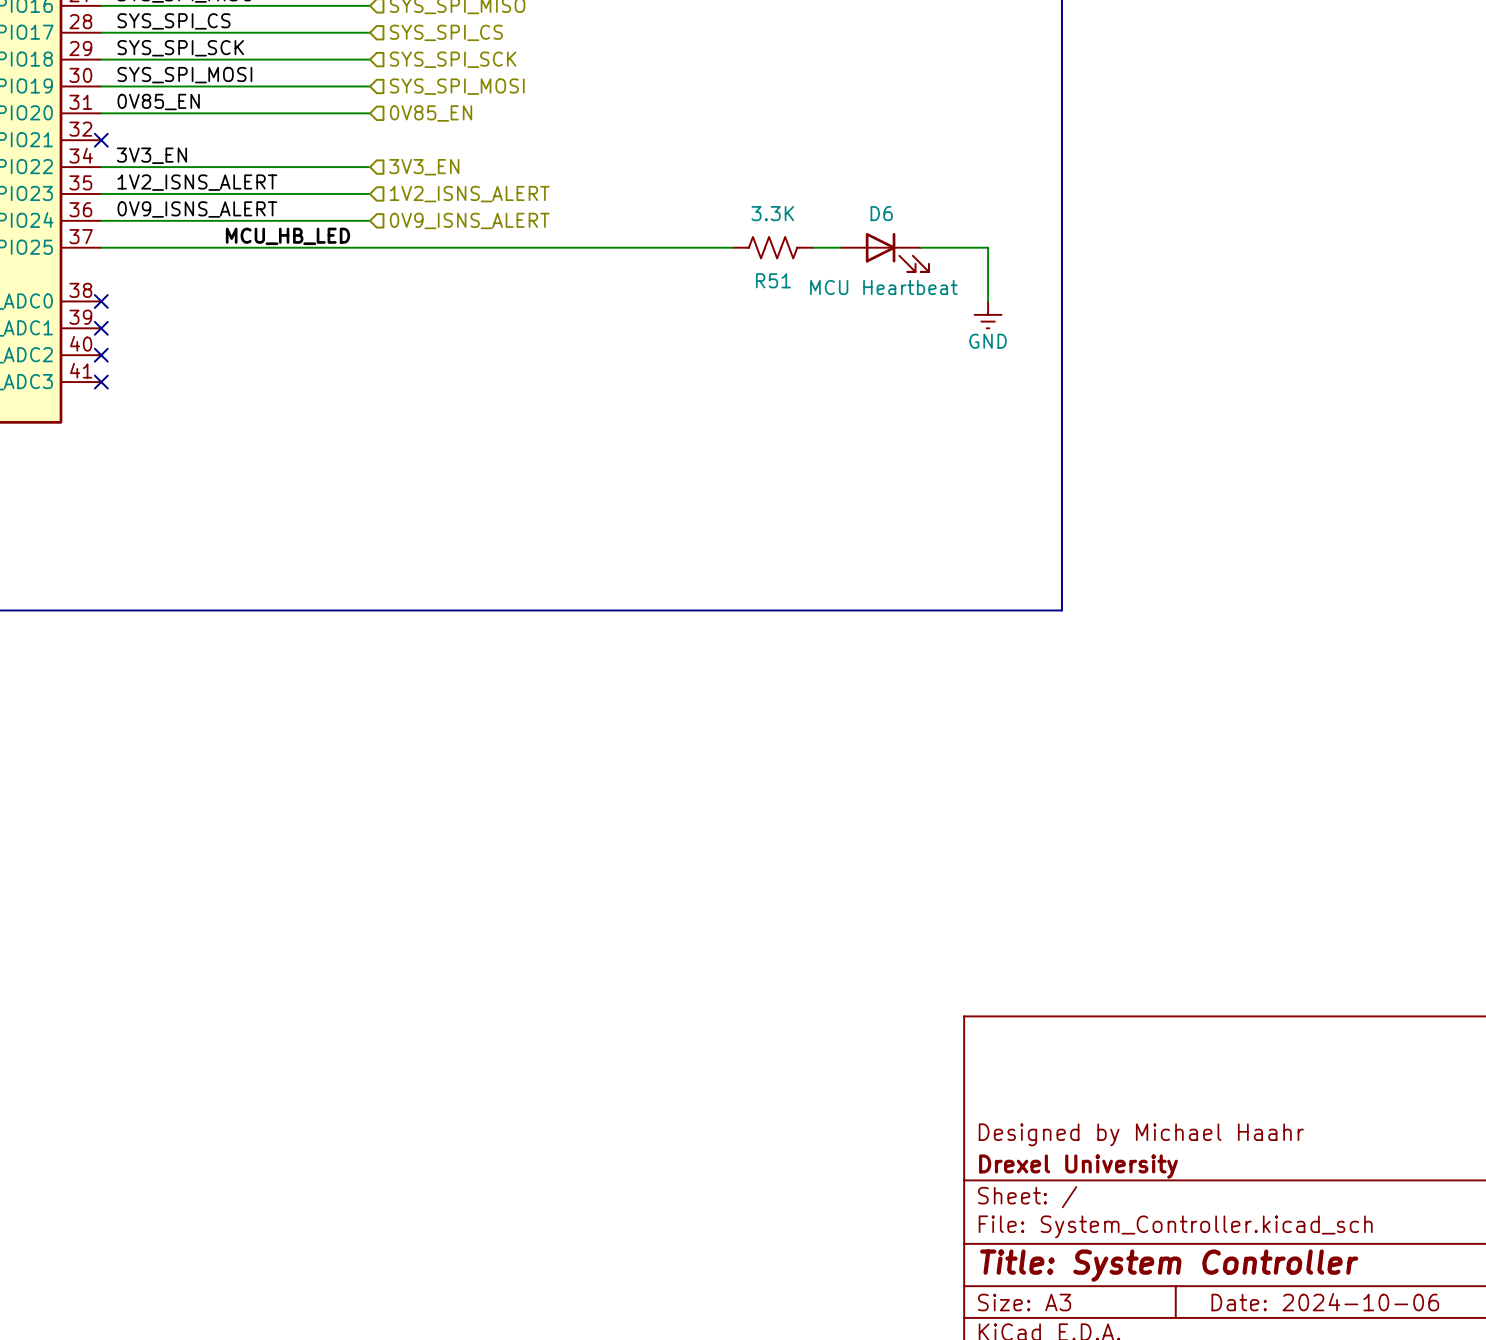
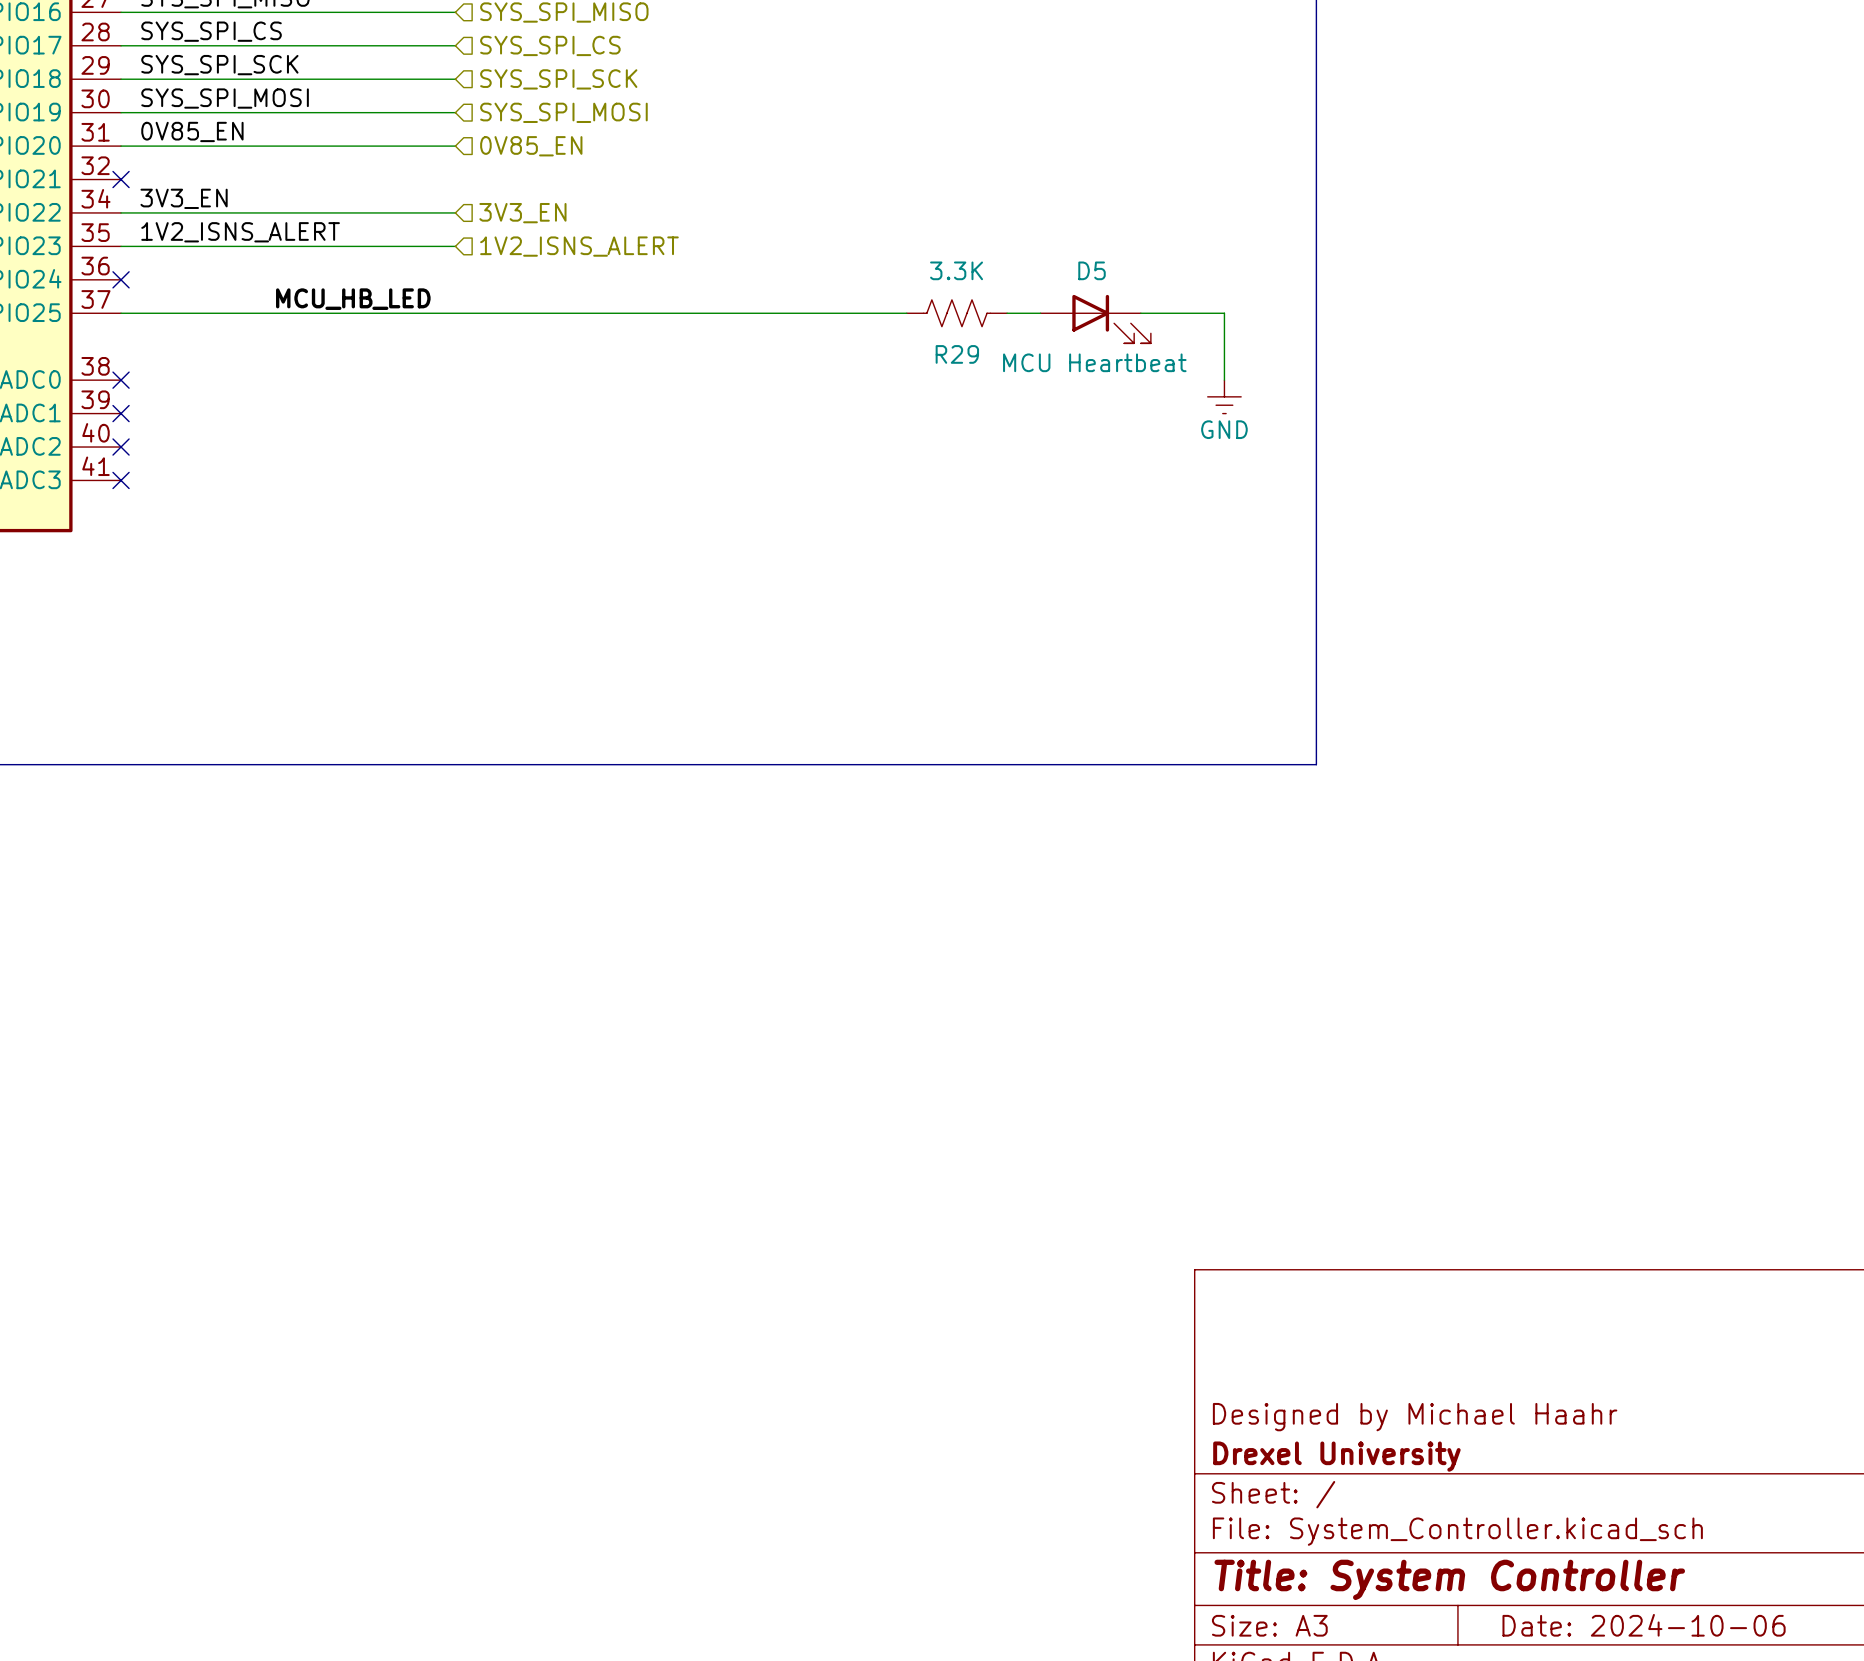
label: 0V9_ISNS_ALERT (197, 209) -> none
D6 name: D6 (881, 213) -> D5 (1092, 270)
wire: (101, 220) (370, 220) -> none
no-connect mark: none -> (121, 279)
hierarchical label: 0V9_ISNS_ALERT (469, 220) -> none
R51 name: R51 (773, 280) -> R29 (957, 354)

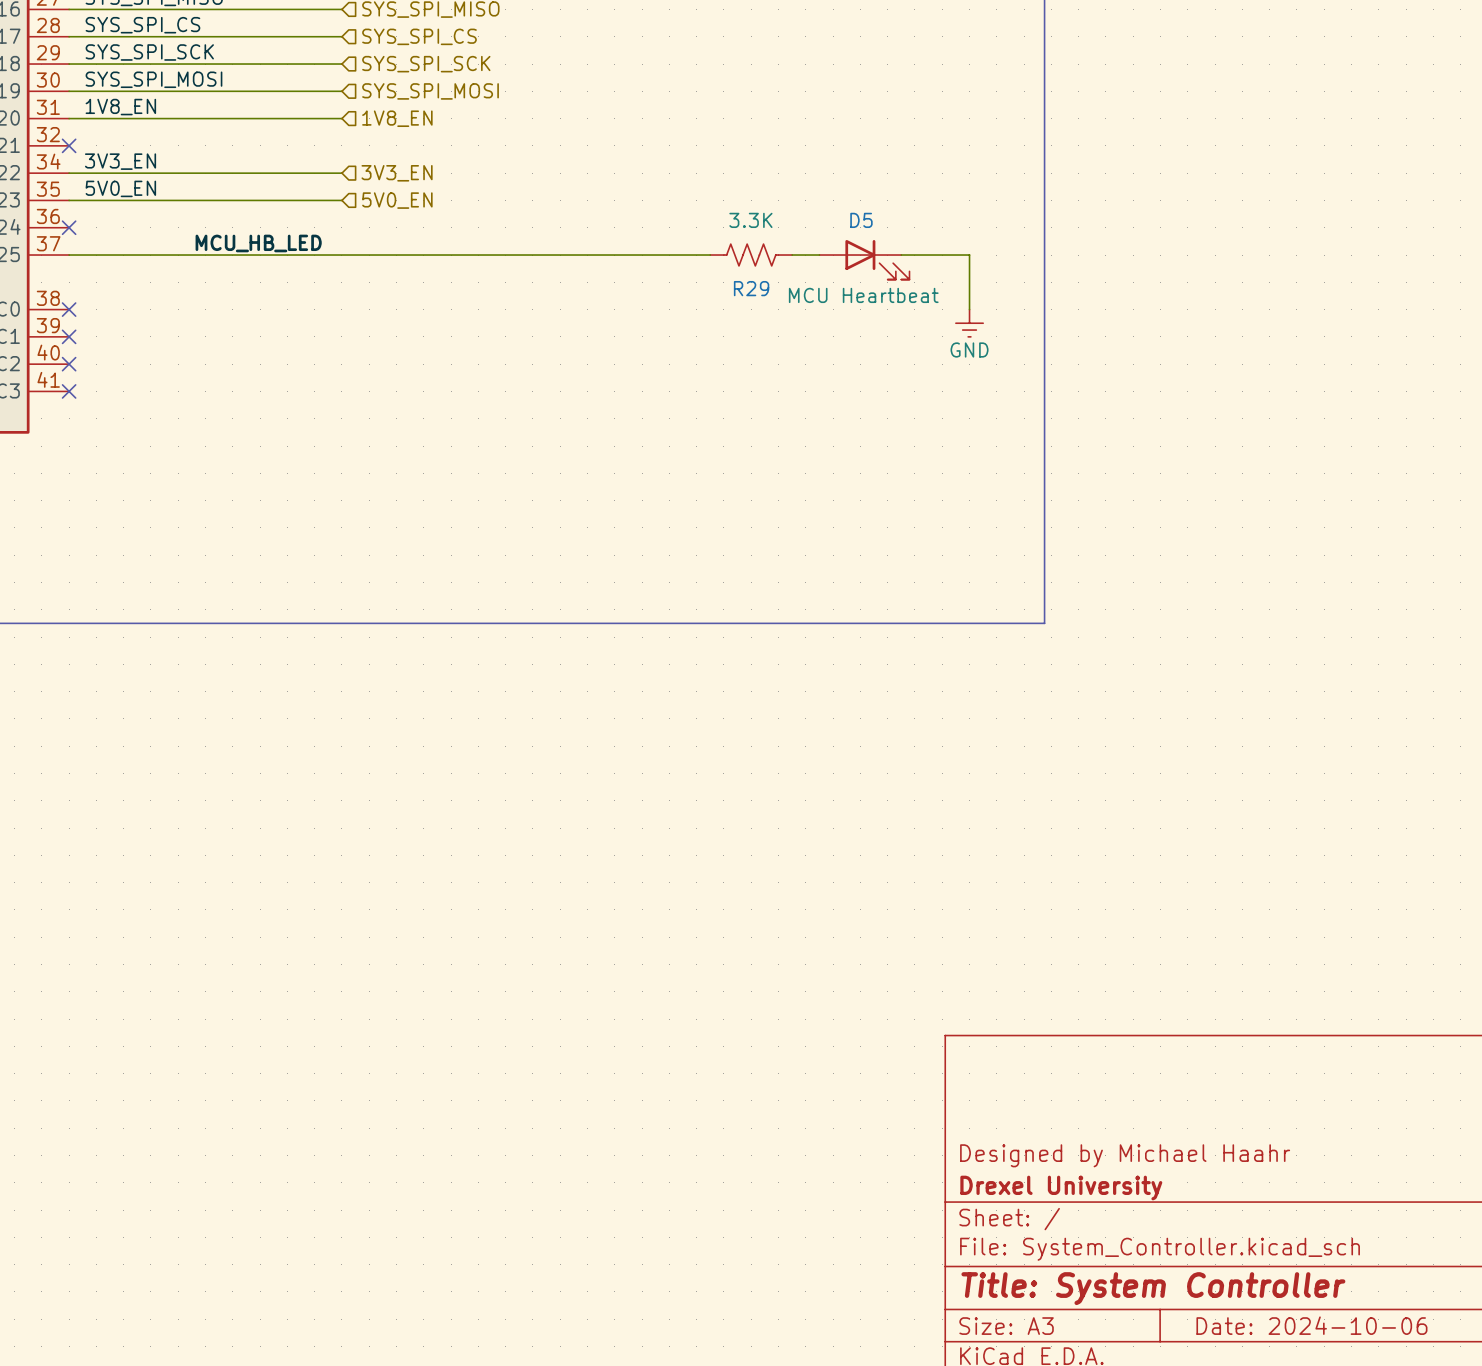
label: 0V85_EN (192, 131) -> 1V8_EN (120, 107)
hierarchical label: 0V85_EN (531, 146) -> 1V8_EN (397, 118)
label: 1V2_ISNS_ALERT (240, 232) -> 5V0_EN (120, 188)
hierarchical label: 1V2_ISNS_ALERT (579, 246) -> 5V0_EN (397, 200)

